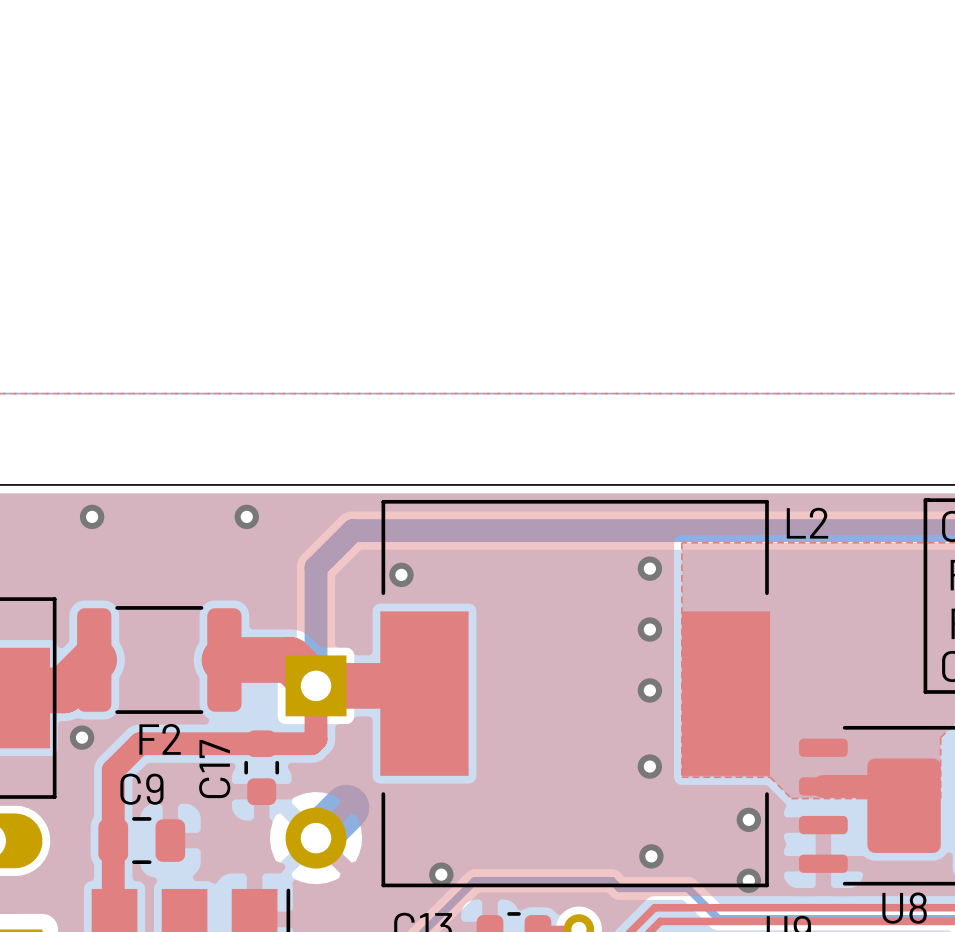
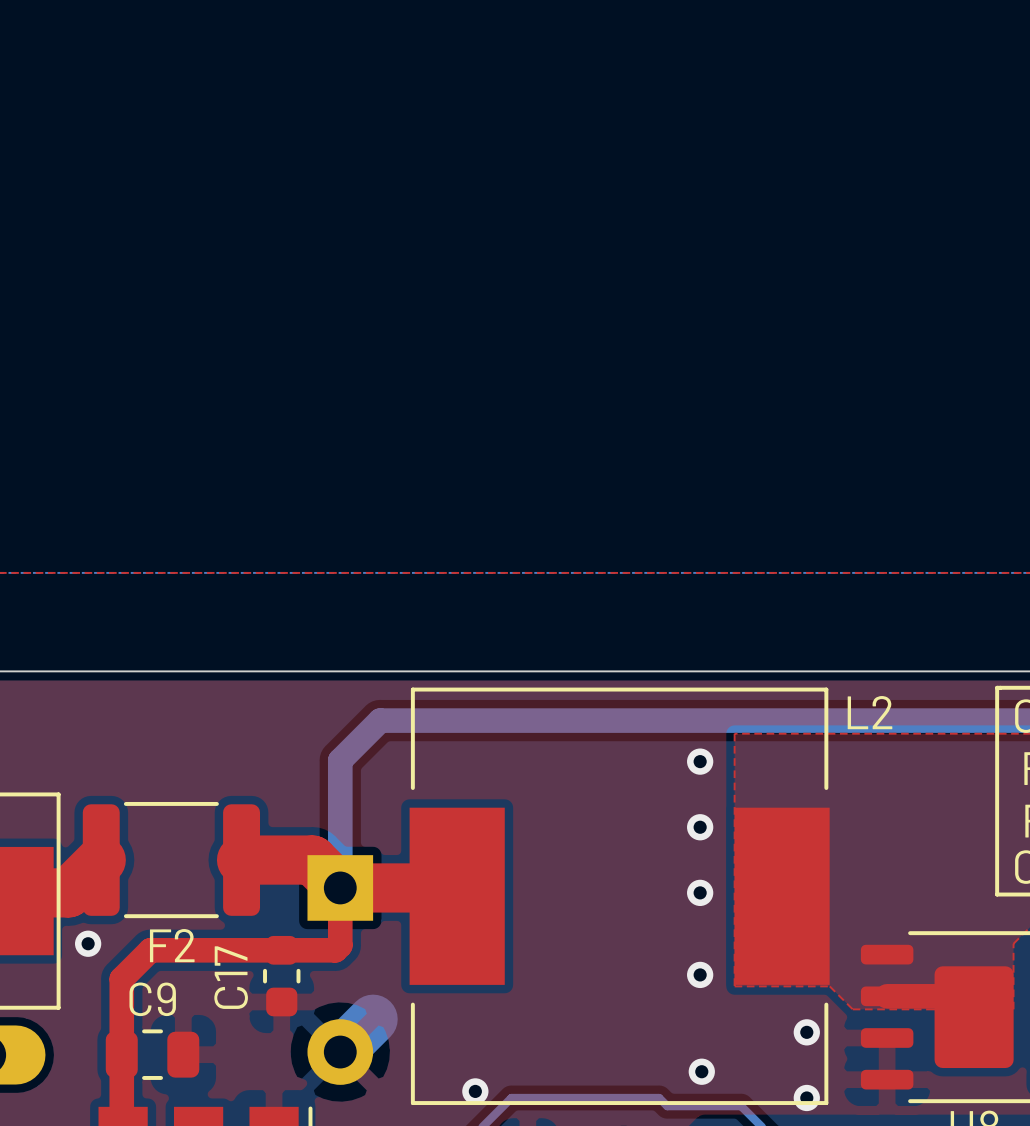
via: (92, 516) -> none
via: (246, 516) -> none
via: (401, 574) -> none

